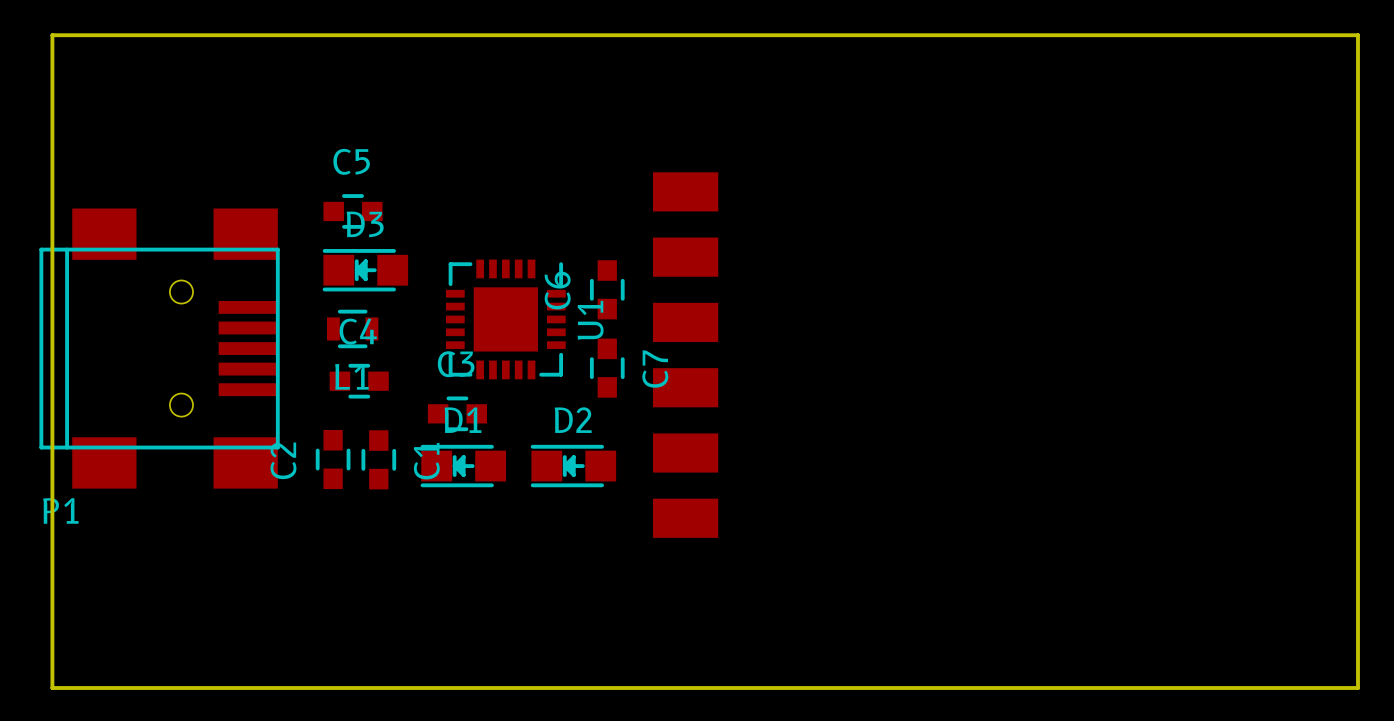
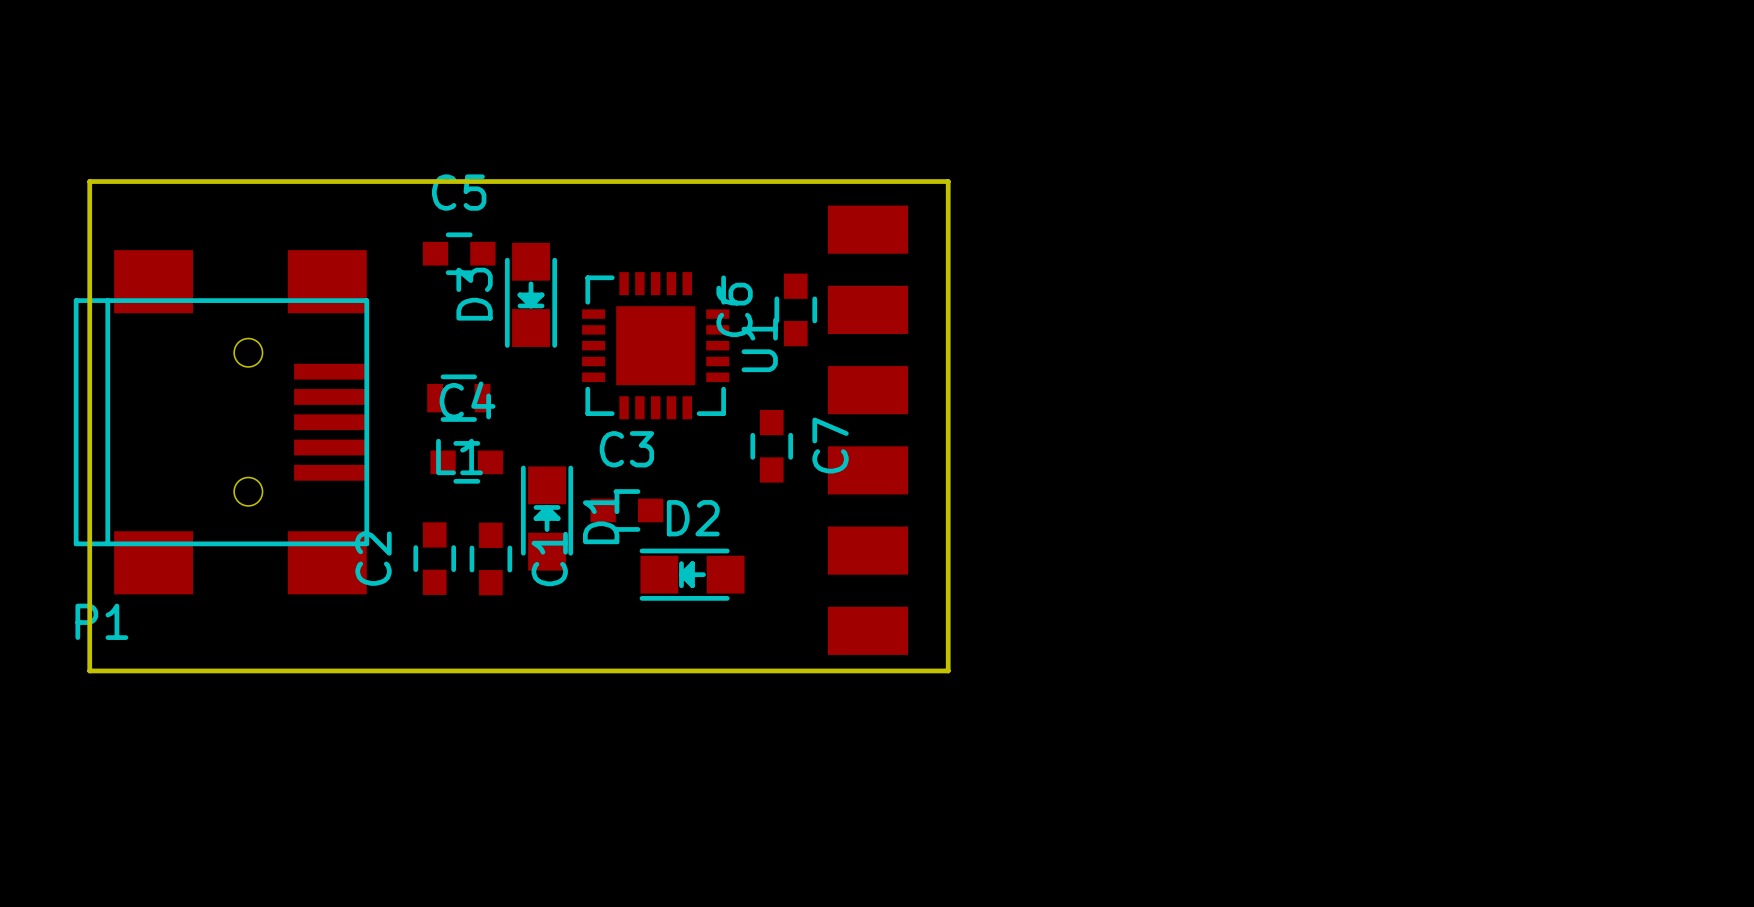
board edge: (52, 152) (52, 35) (1358, 35) (1358, 688) (52, 688) (52, 550) -> (89, 181) (948, 181) (948, 670) (89, 670)
D3 rotation: 0° (365, 270) -> 90° counterclockwise (531, 295)
D3 position: (365, 270) -> (531, 295)
C6 position: (607, 289) -> (795, 309)
U1 position: (505, 319) -> (655, 345)
C3 position: (457, 413) -> (626, 510)
D1 rotation: 0° (463, 466) -> 90° clockwise (547, 518)
D1 position: (463, 466) -> (547, 518)
D2 position: (573, 466) -> (692, 574)

